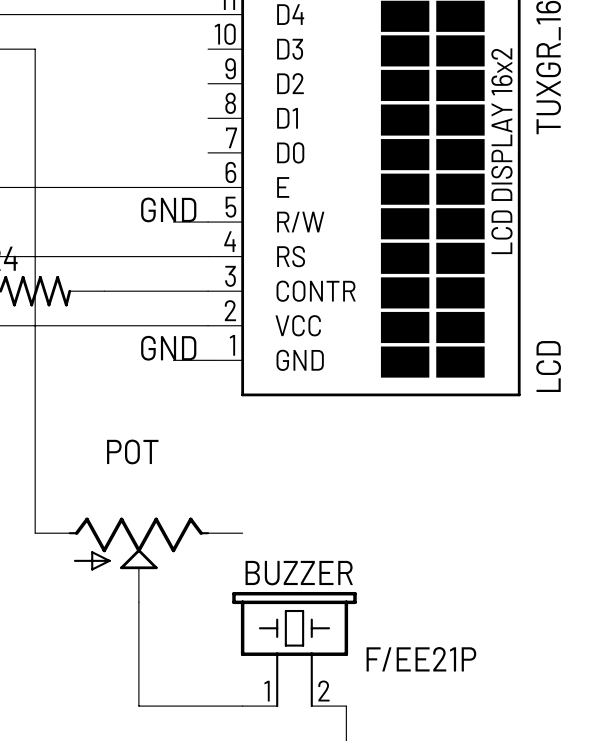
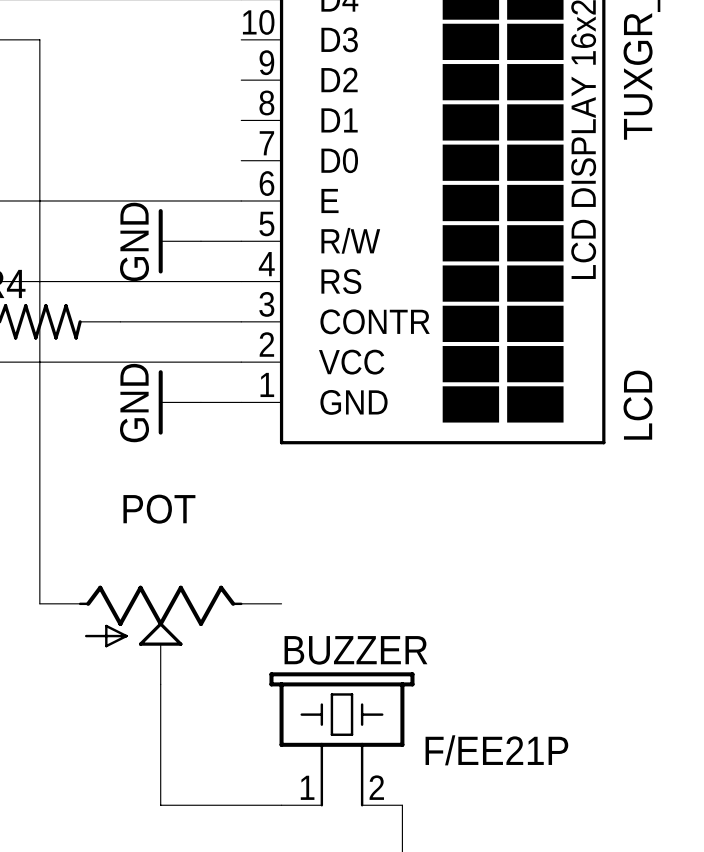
label: GND (168, 209) -> none
power symbol: none -> GND (179, 241)
label: GND (168, 348) -> none
power symbol: none -> GND (179, 402)

